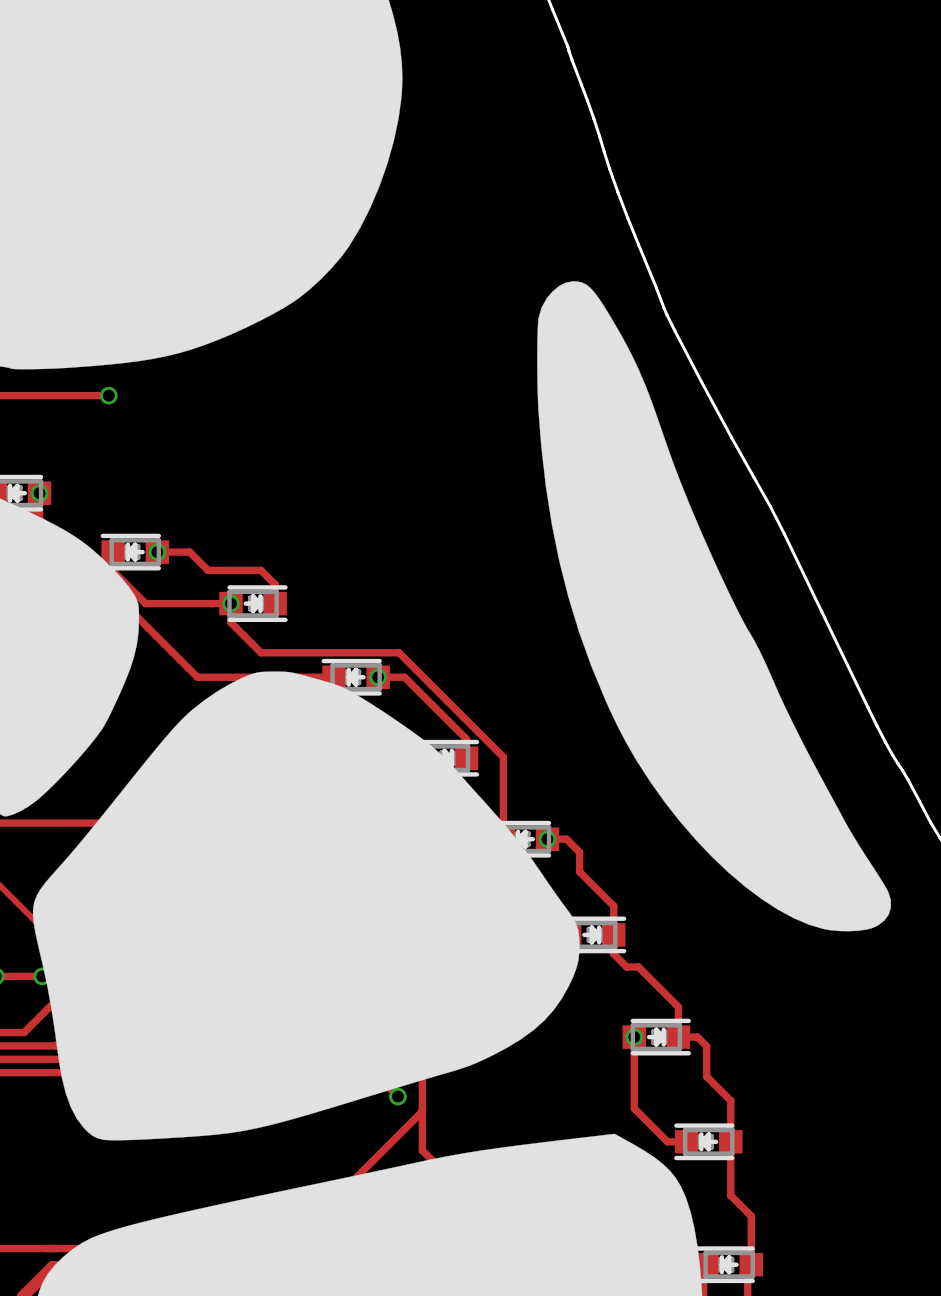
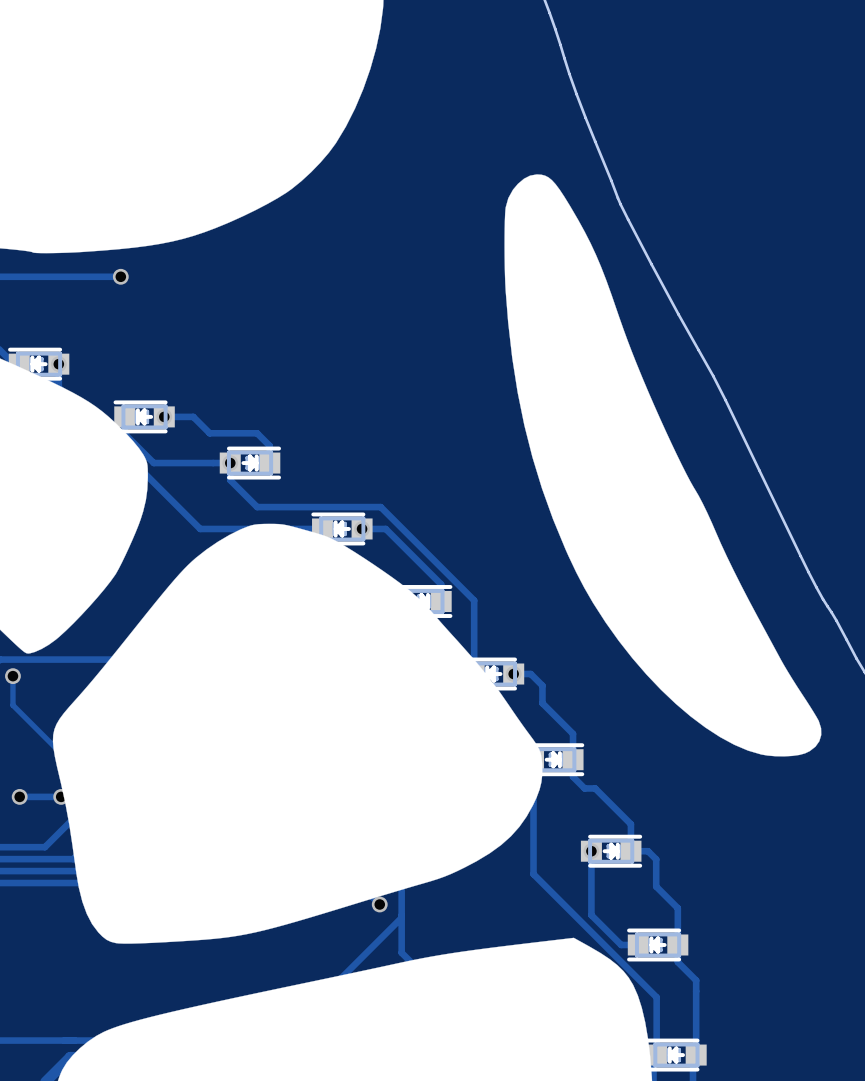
track: none -> (533, 759) (533, 874) (656, 997) (656, 1055)
track: (730, 1160) (730, 1195) (751, 1216) -> (677, 962) (696, 980) (696, 1011)

